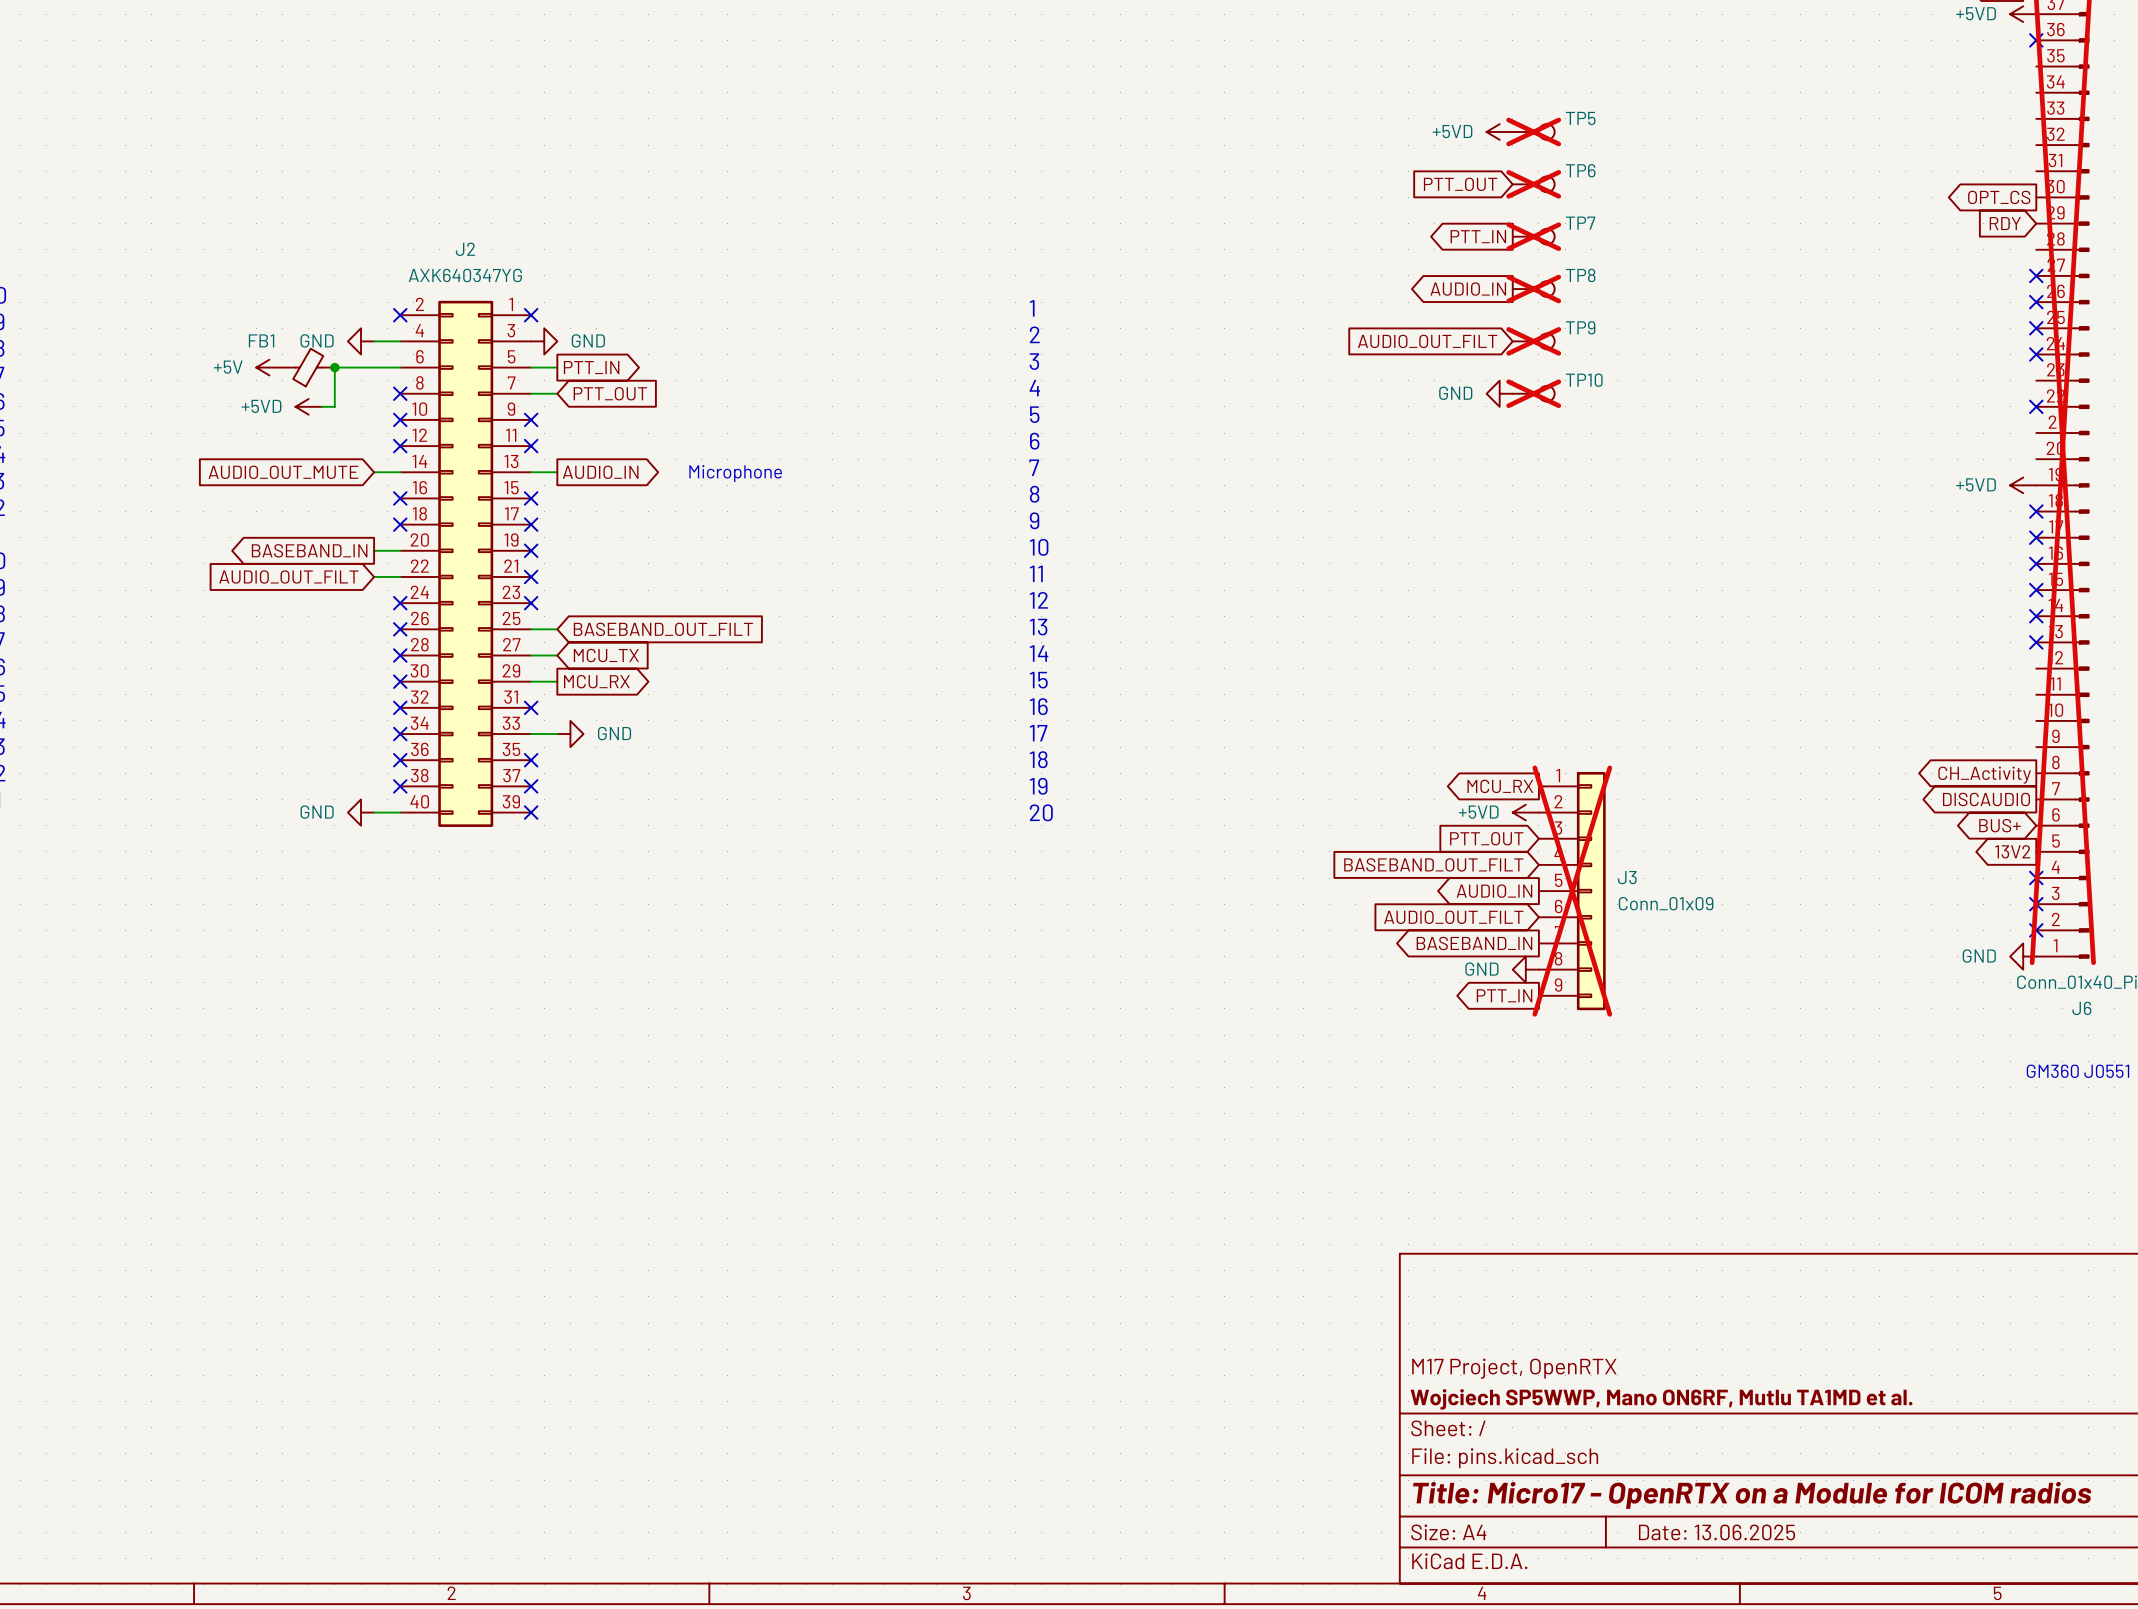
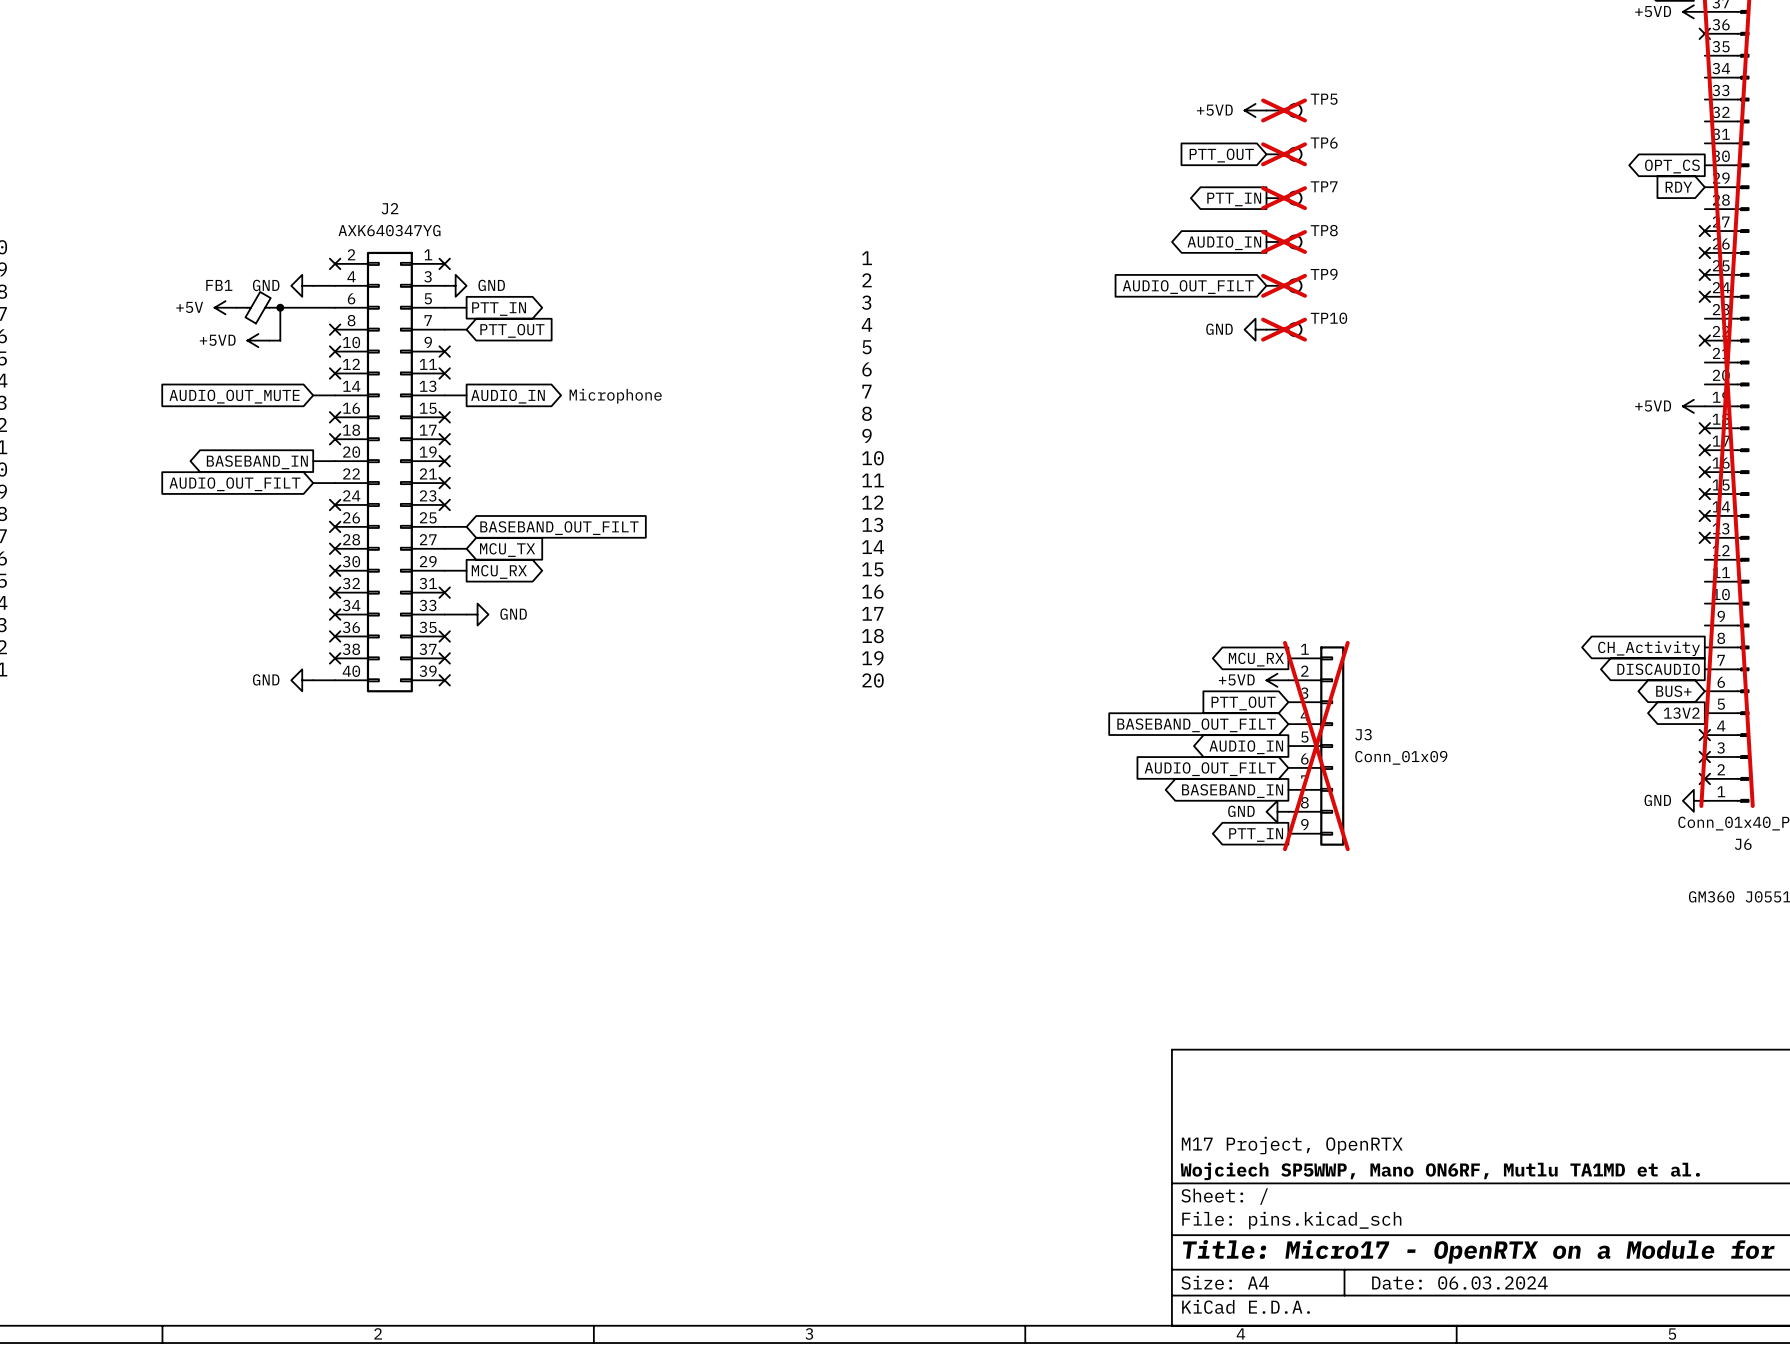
title block: Date: 13.06.2025 (1717, 1532) -> Date: 06.03.2024 (1459, 1282)

